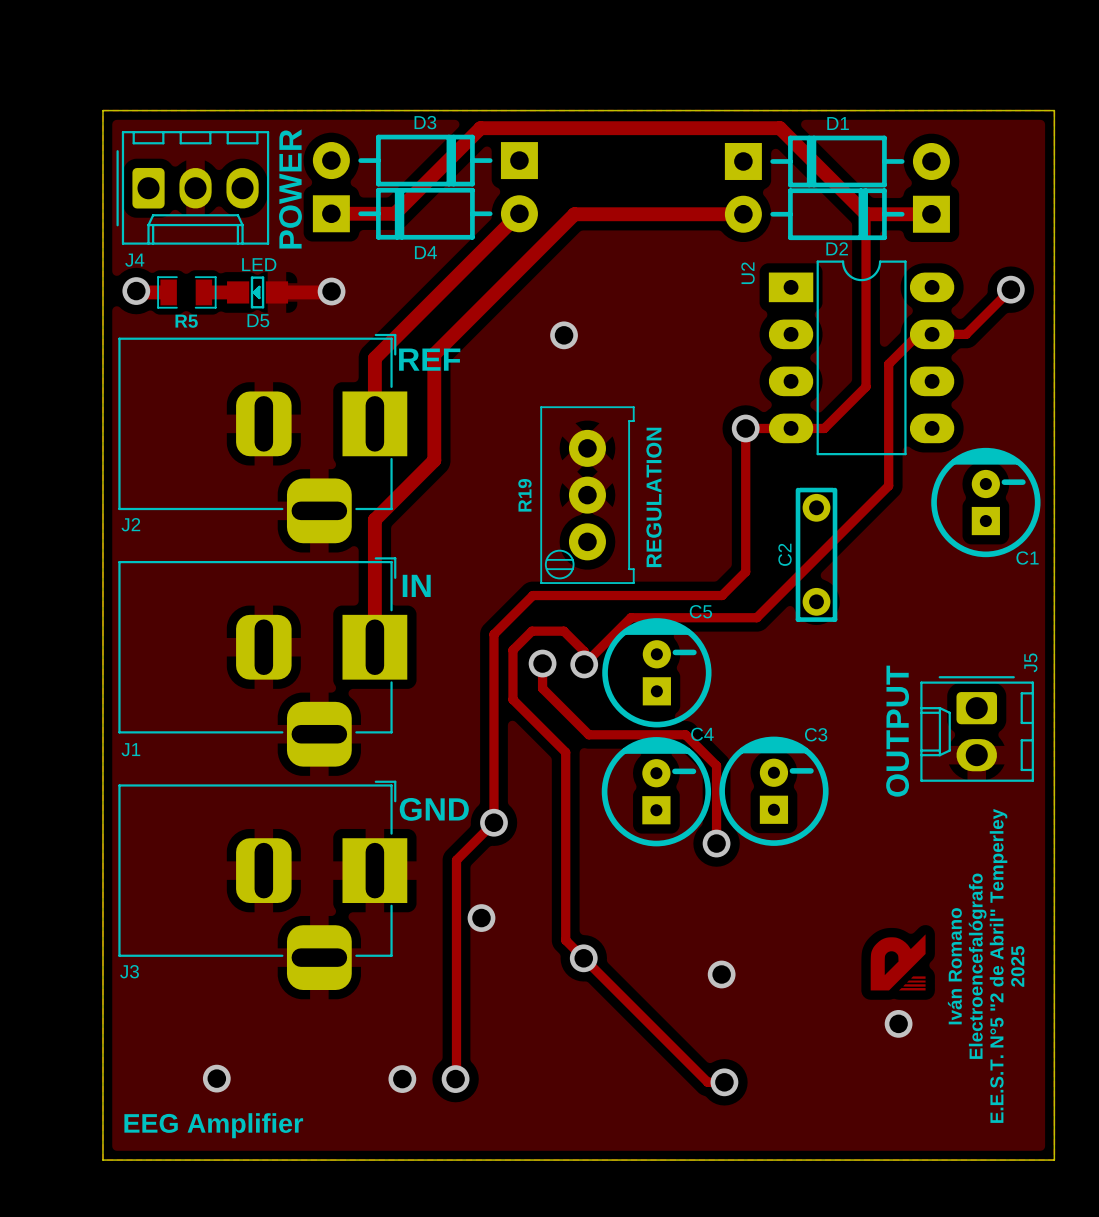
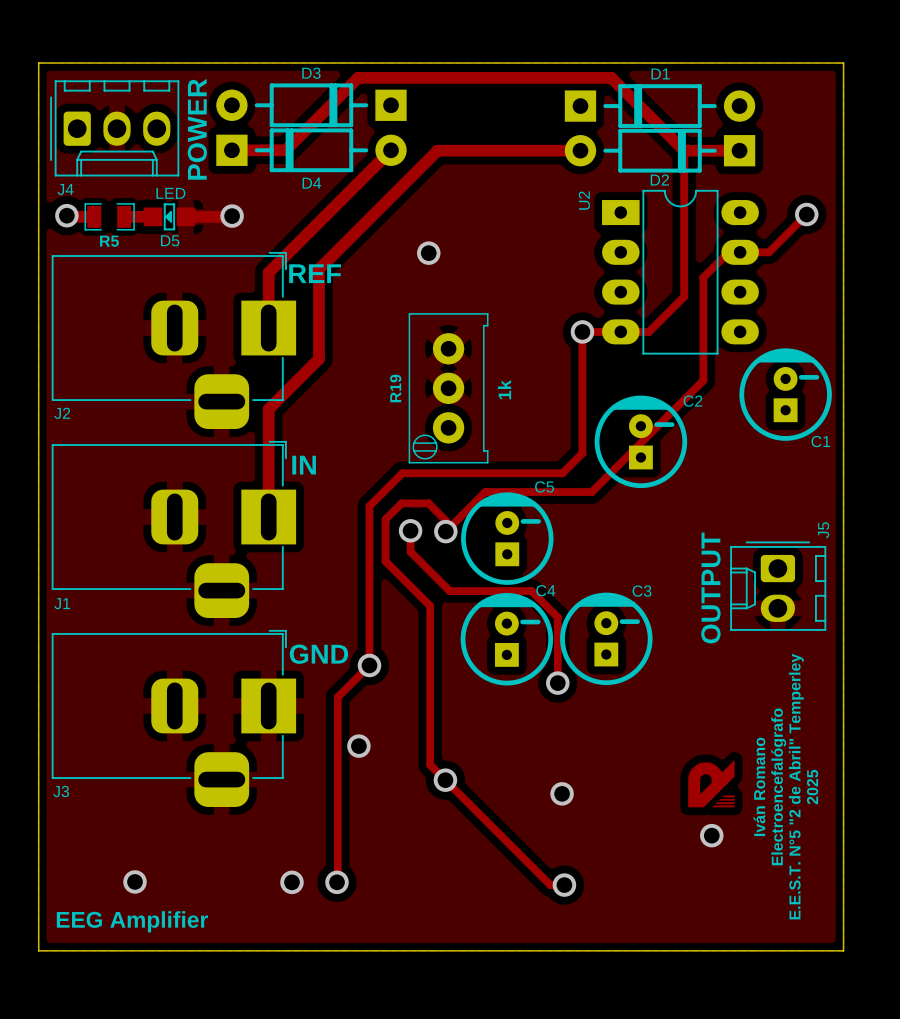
C2 footprint: [795, 487, 838, 622] -> [594, 395, 688, 489]
R19 value: REGULATION (654, 497) -> 1k (504, 389)
C2 name position: C2 (785, 554) -> C2 (693, 401)

